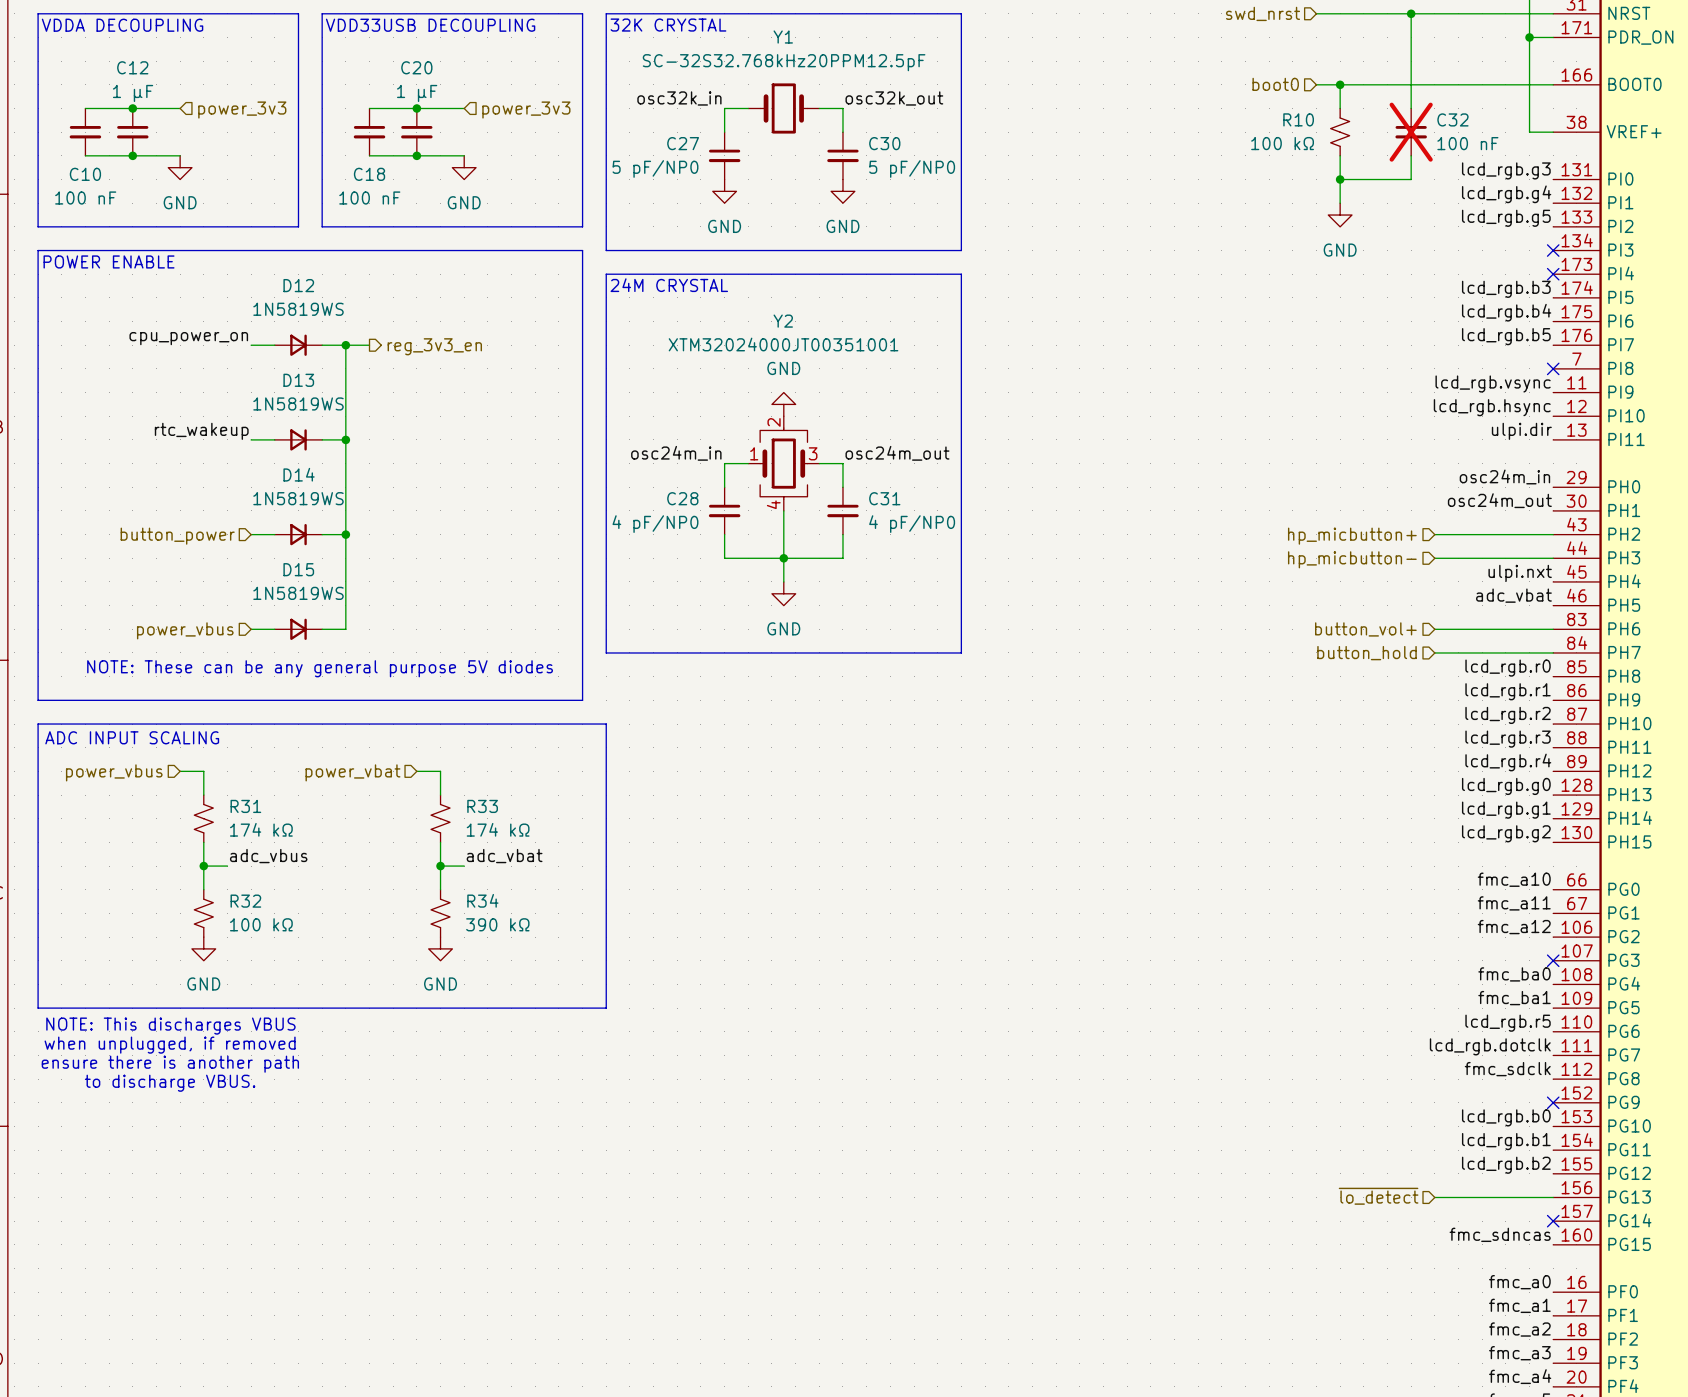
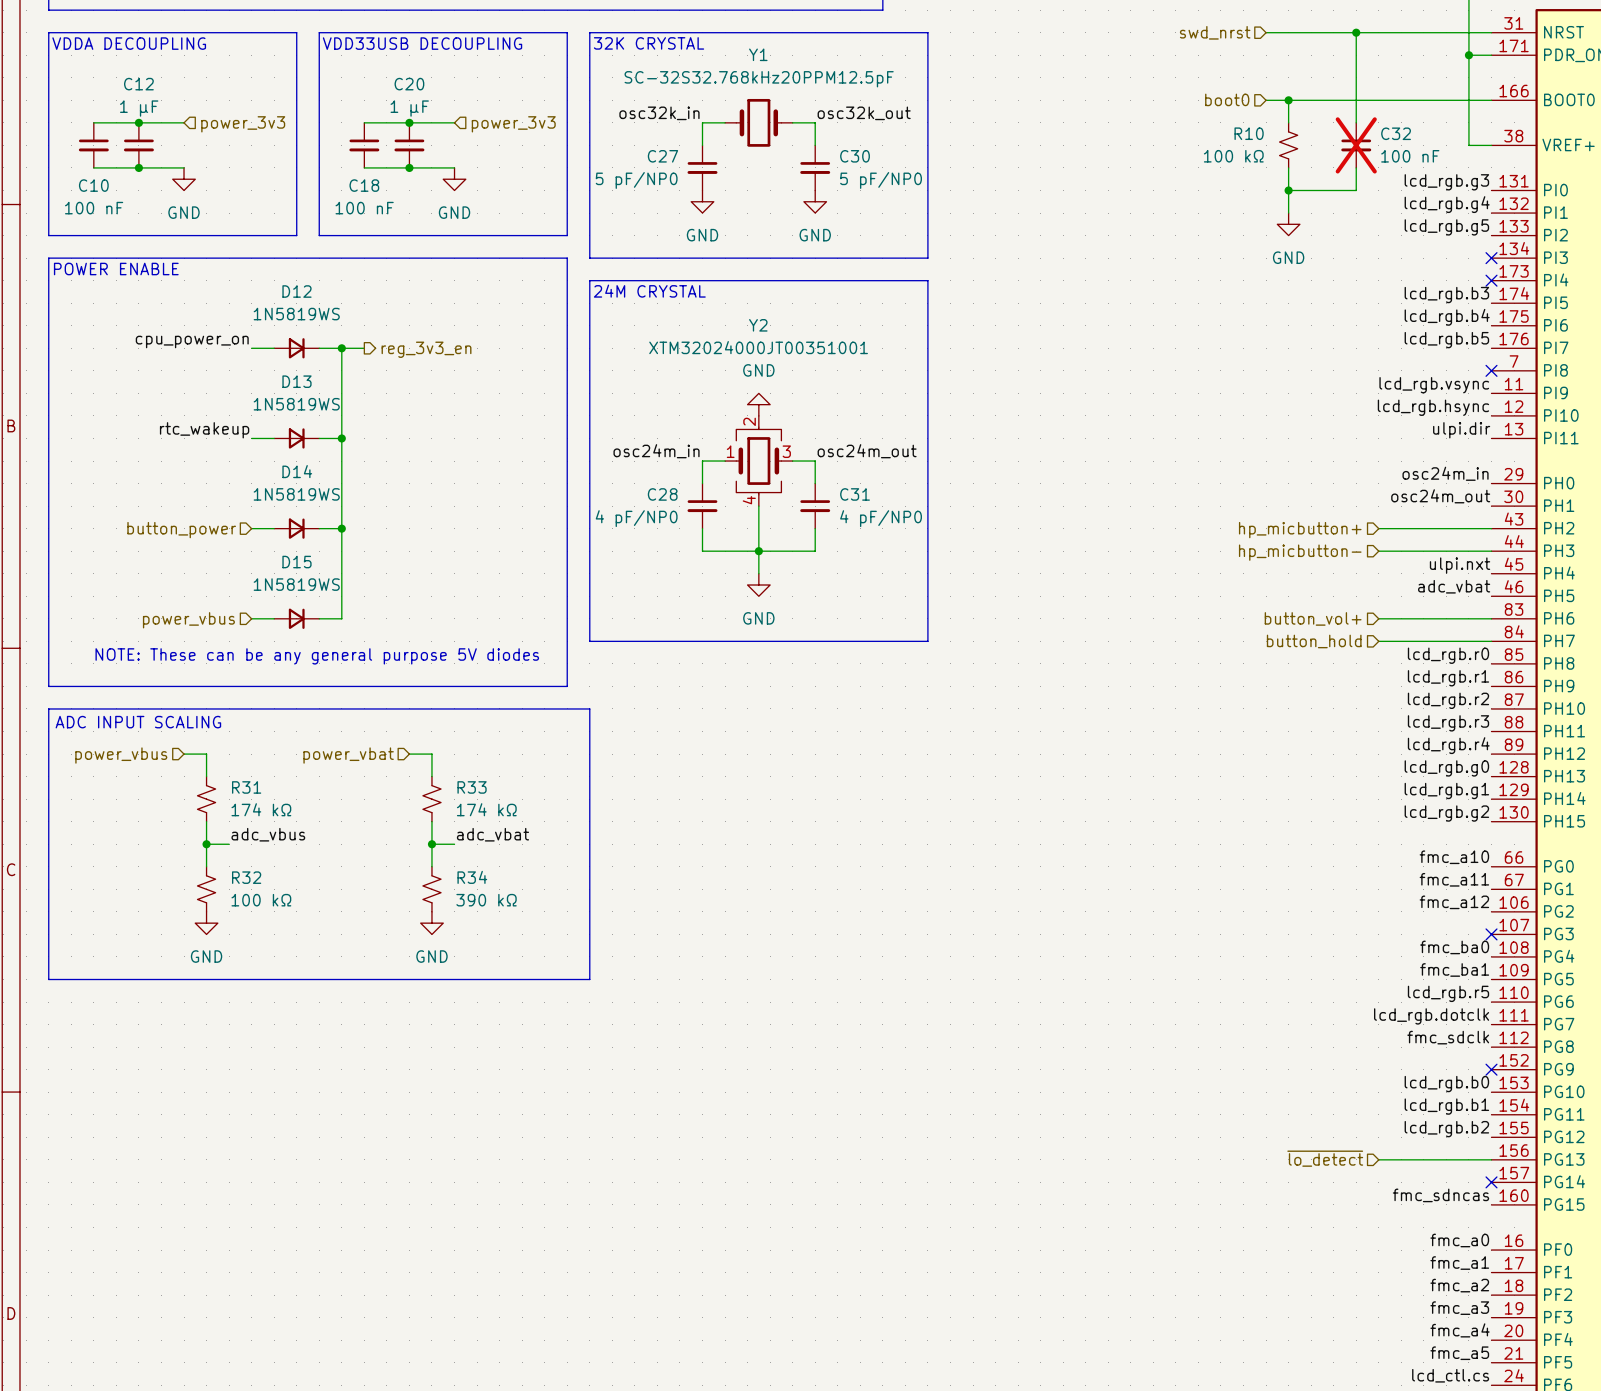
text: NOTE: This discharges VBUS (170, 1026) -> none
text: when unplugged, if removed (170, 1045) -> none
text: ensure there is another path (170, 1064) -> none
text: to discharge VBUS. (170, 1083) -> none

